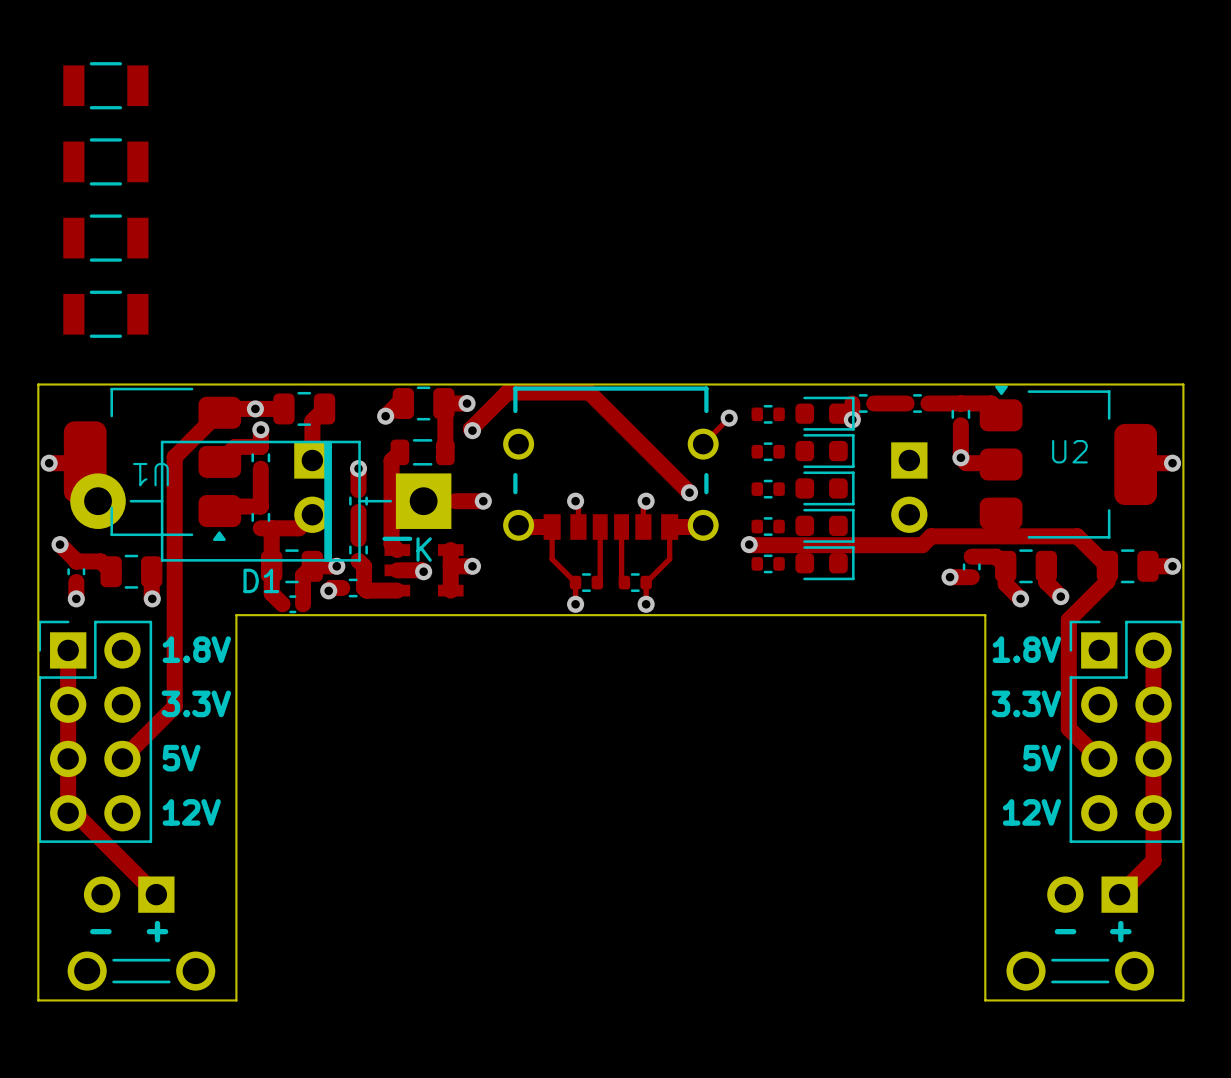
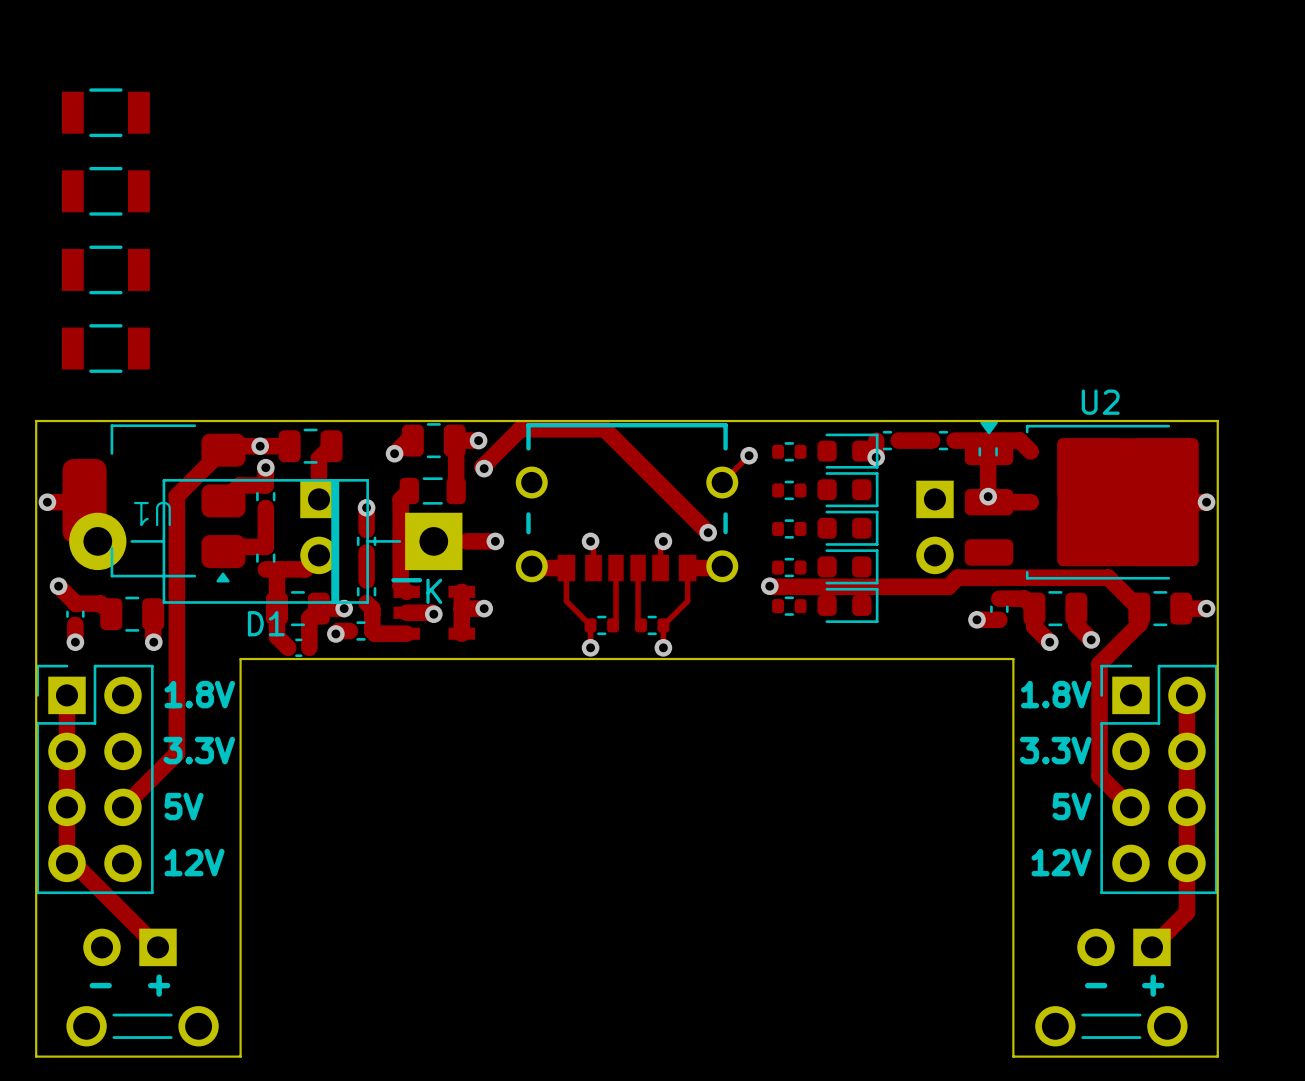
U2 footprint: [979, 385, 1158, 539] -> [964, 421, 1199, 580]
U2 name position: U2 (1069, 451) -> U2 (1100, 402)

